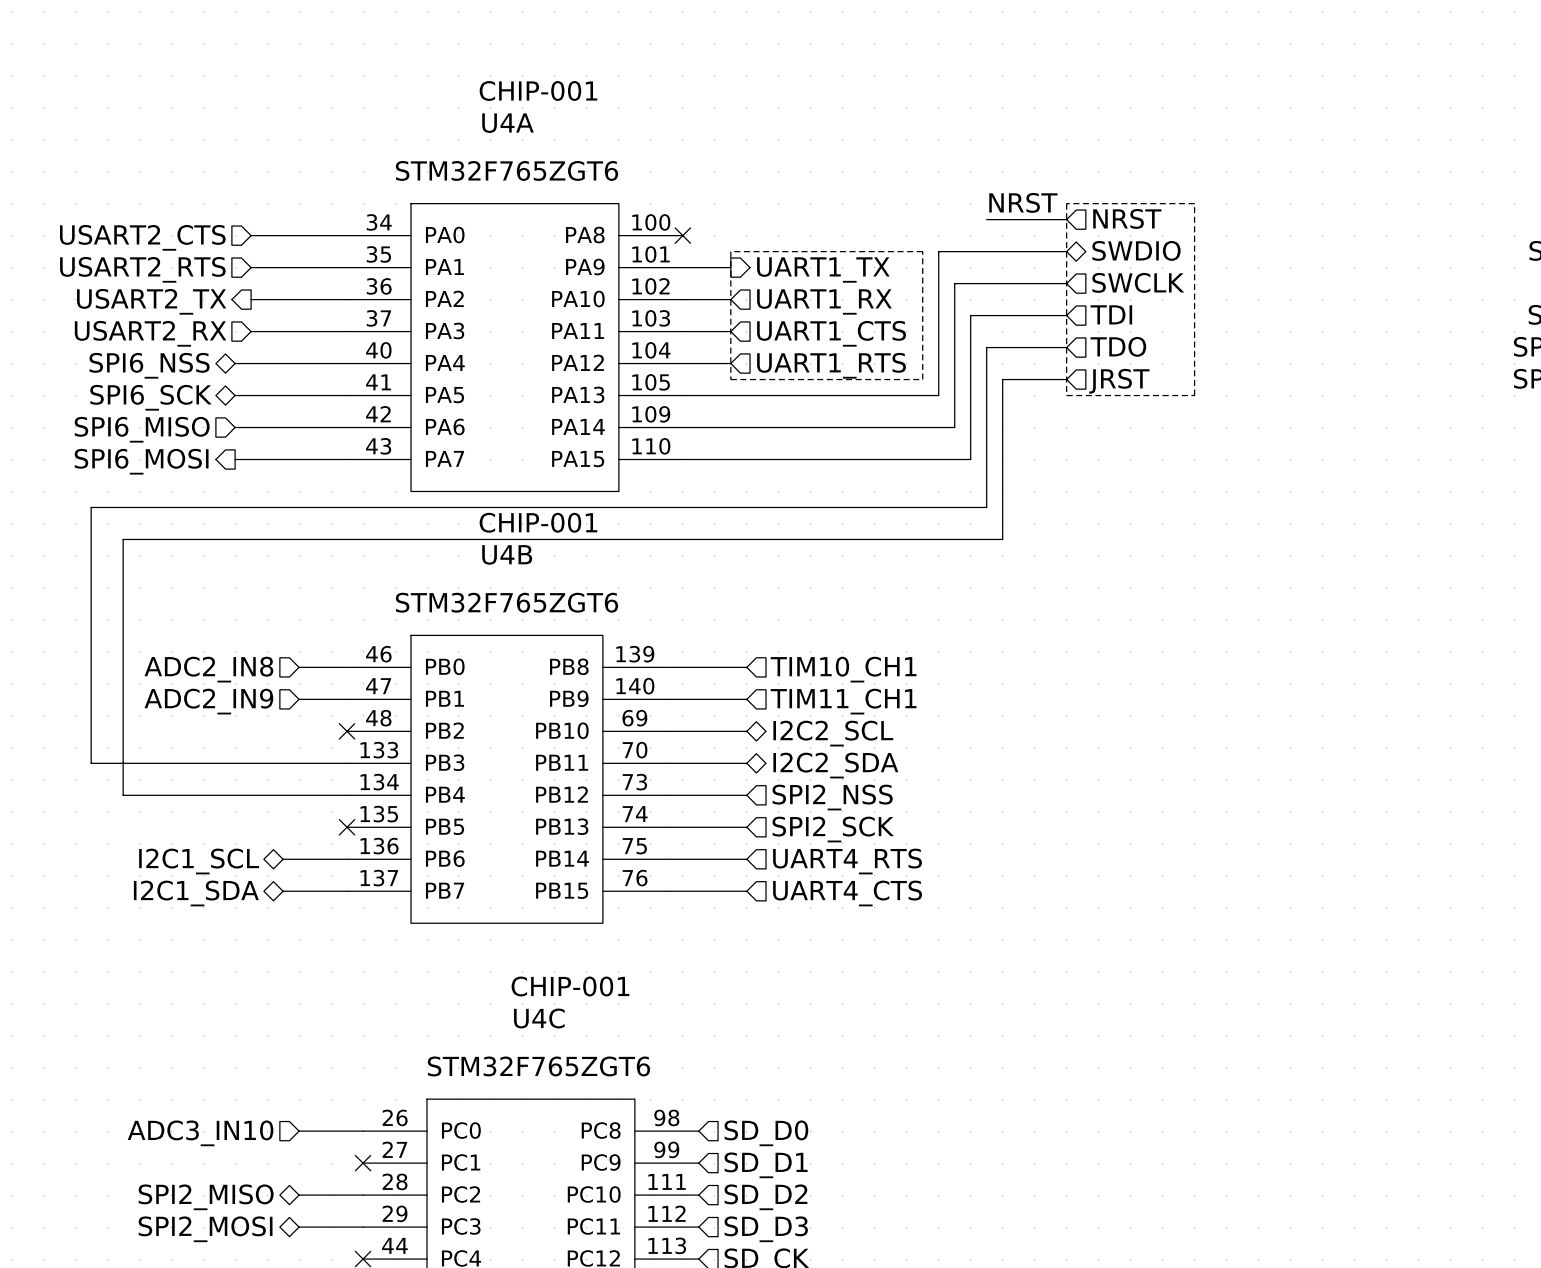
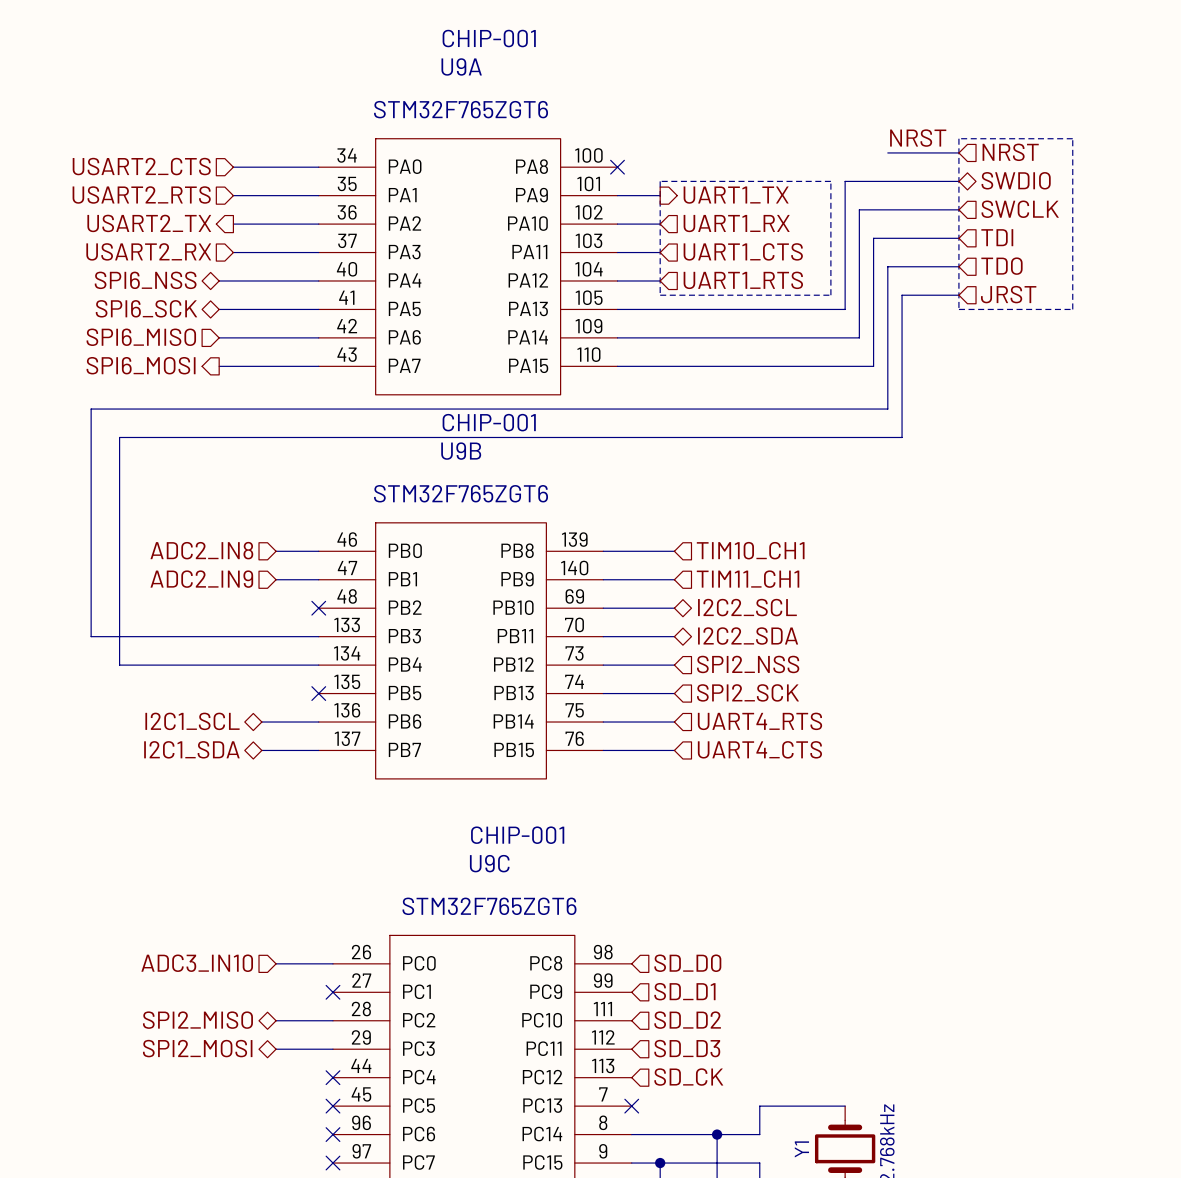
U4A name: U4A (507, 123) -> U9A (461, 66)
U4B name: U4B (507, 554) -> U9B (461, 451)
U4C name: U4C (539, 1018) -> U9C (489, 863)

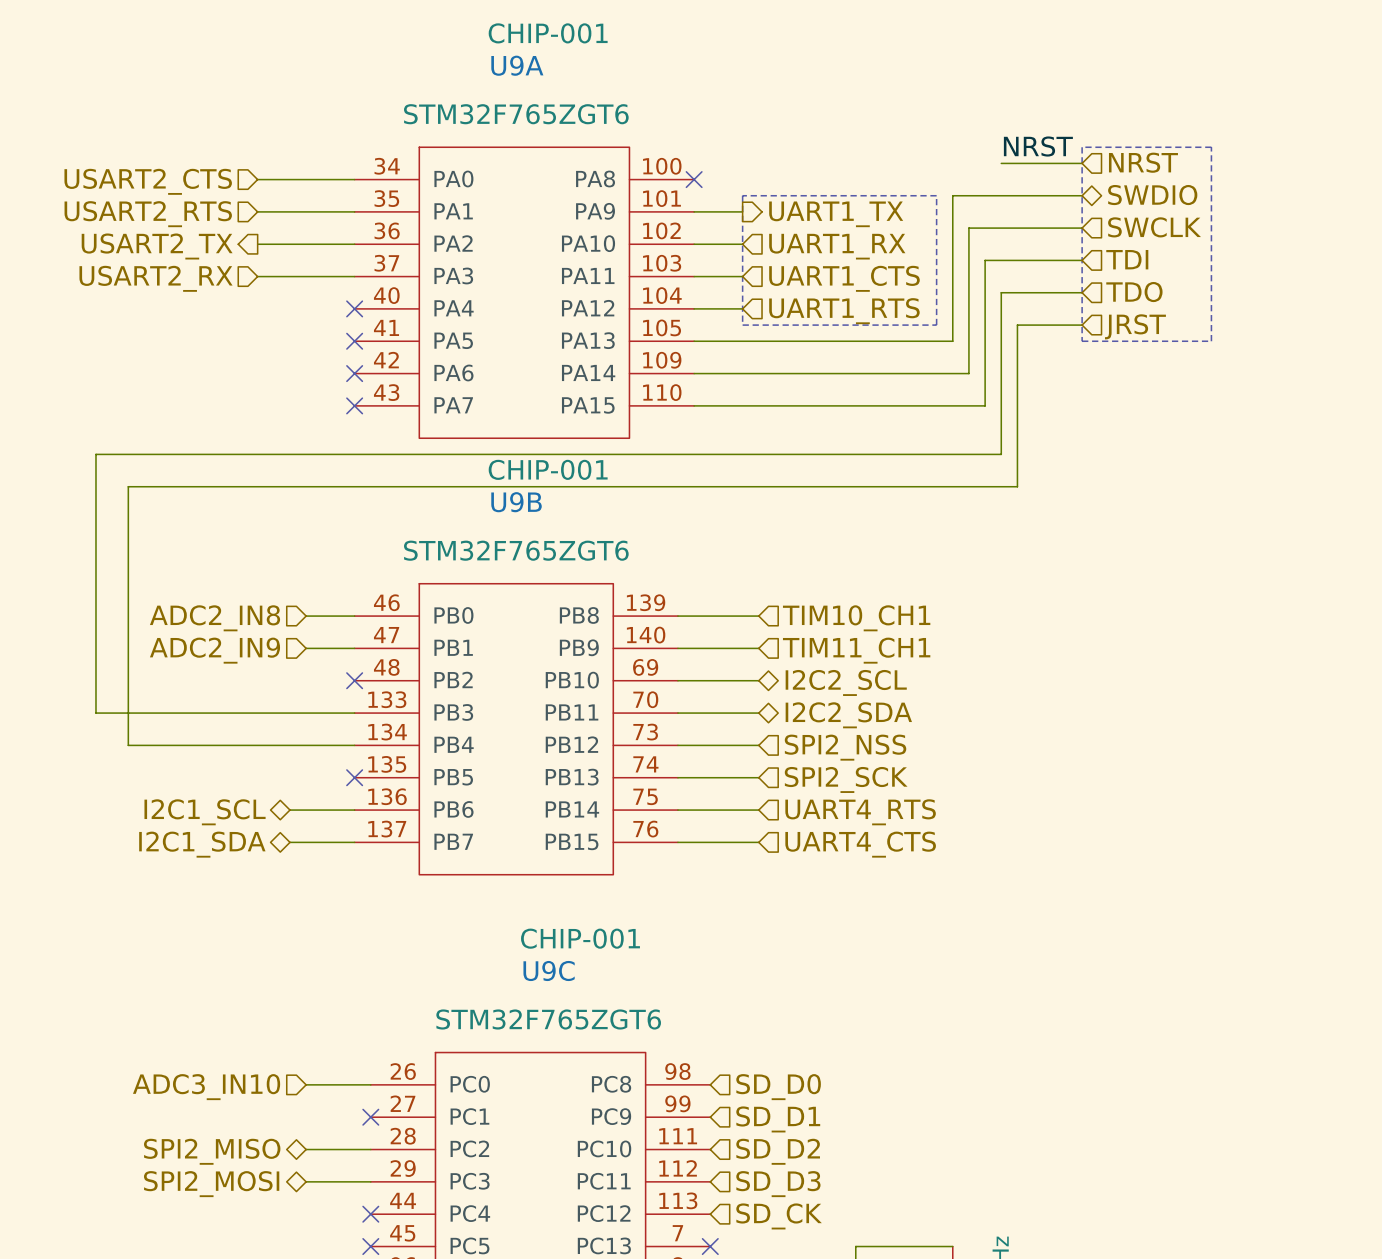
hierarchical label: SPI6_NSS (145, 280) -> none
wire: (219, 280) (318, 280) -> none
no-connect mark: none -> (354, 308)
hierarchical label: SPI6_SCK (146, 308) -> none
wire: (219, 309) (318, 309) -> none
no-connect mark: none -> (354, 341)
hierarchical label: SPI6_MISO (141, 337) -> none
wire: (219, 337) (318, 337) -> none
no-connect mark: none -> (354, 373)
hierarchical label: SPI6_MOSI (141, 365) -> none
wire: (219, 366) (318, 366) -> none
no-connect mark: none -> (354, 405)

